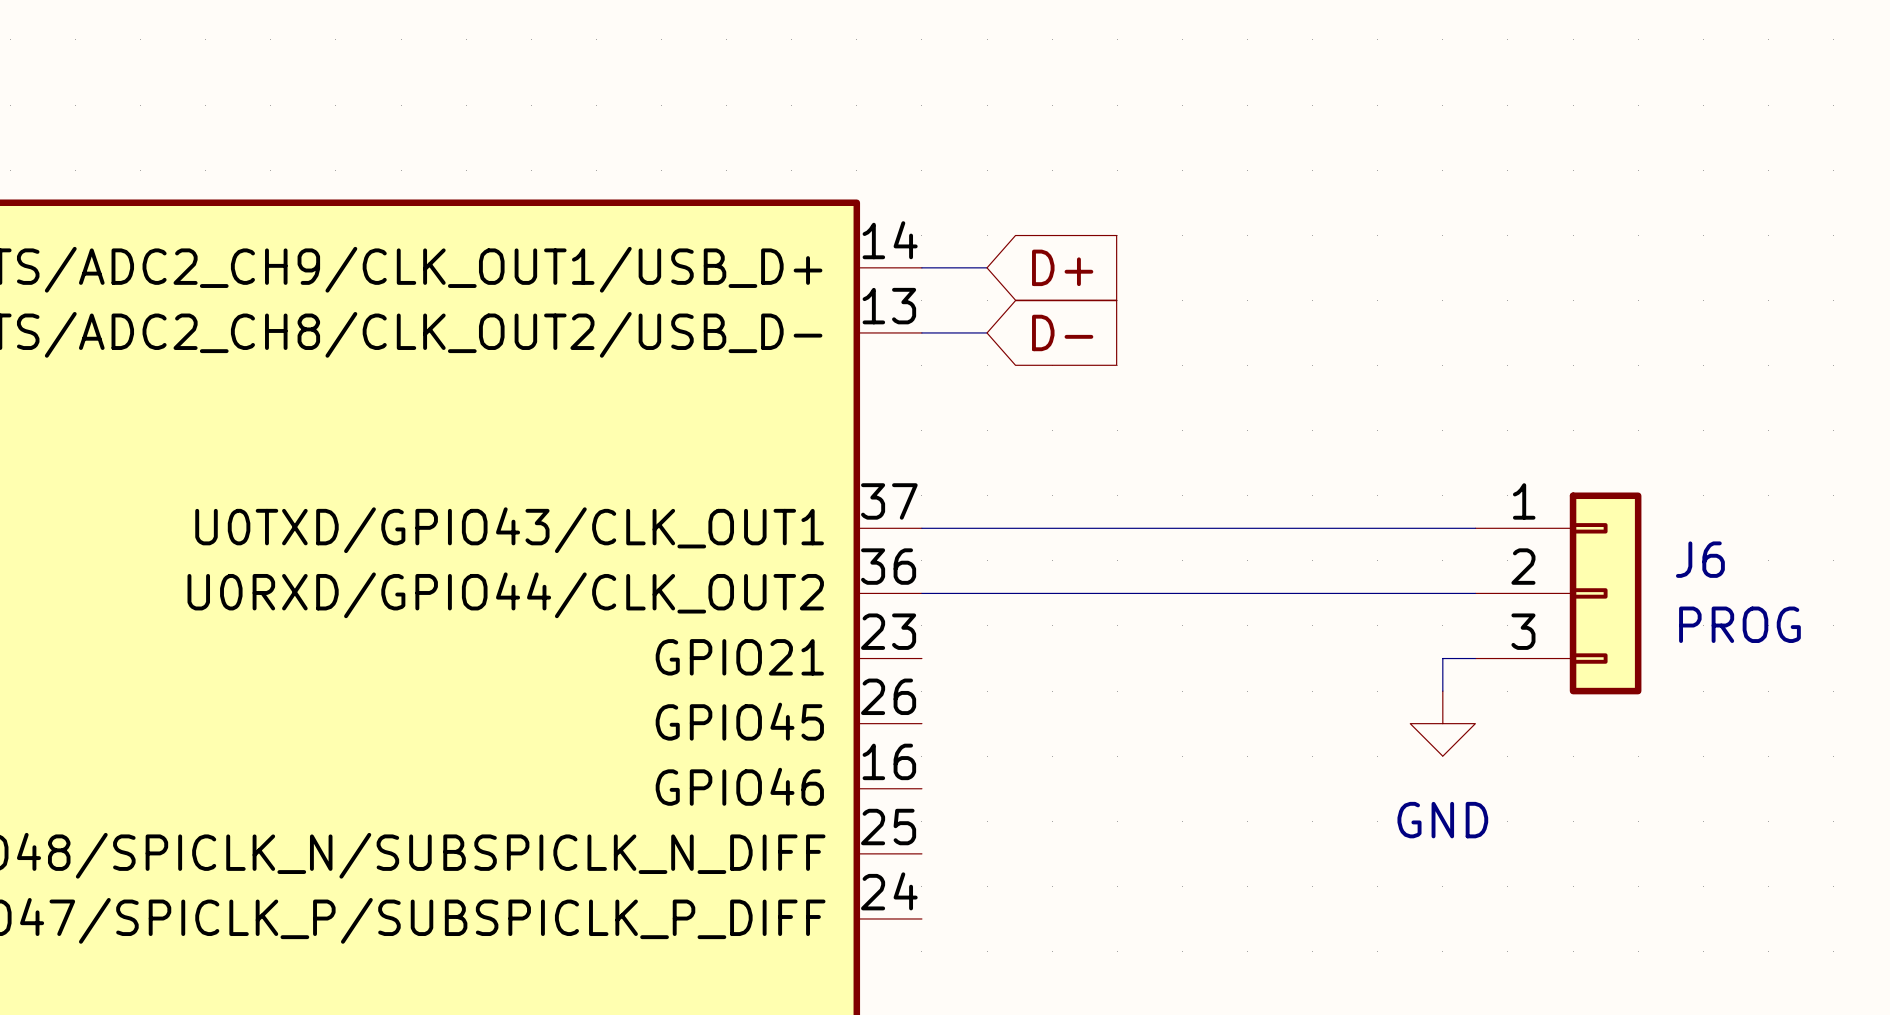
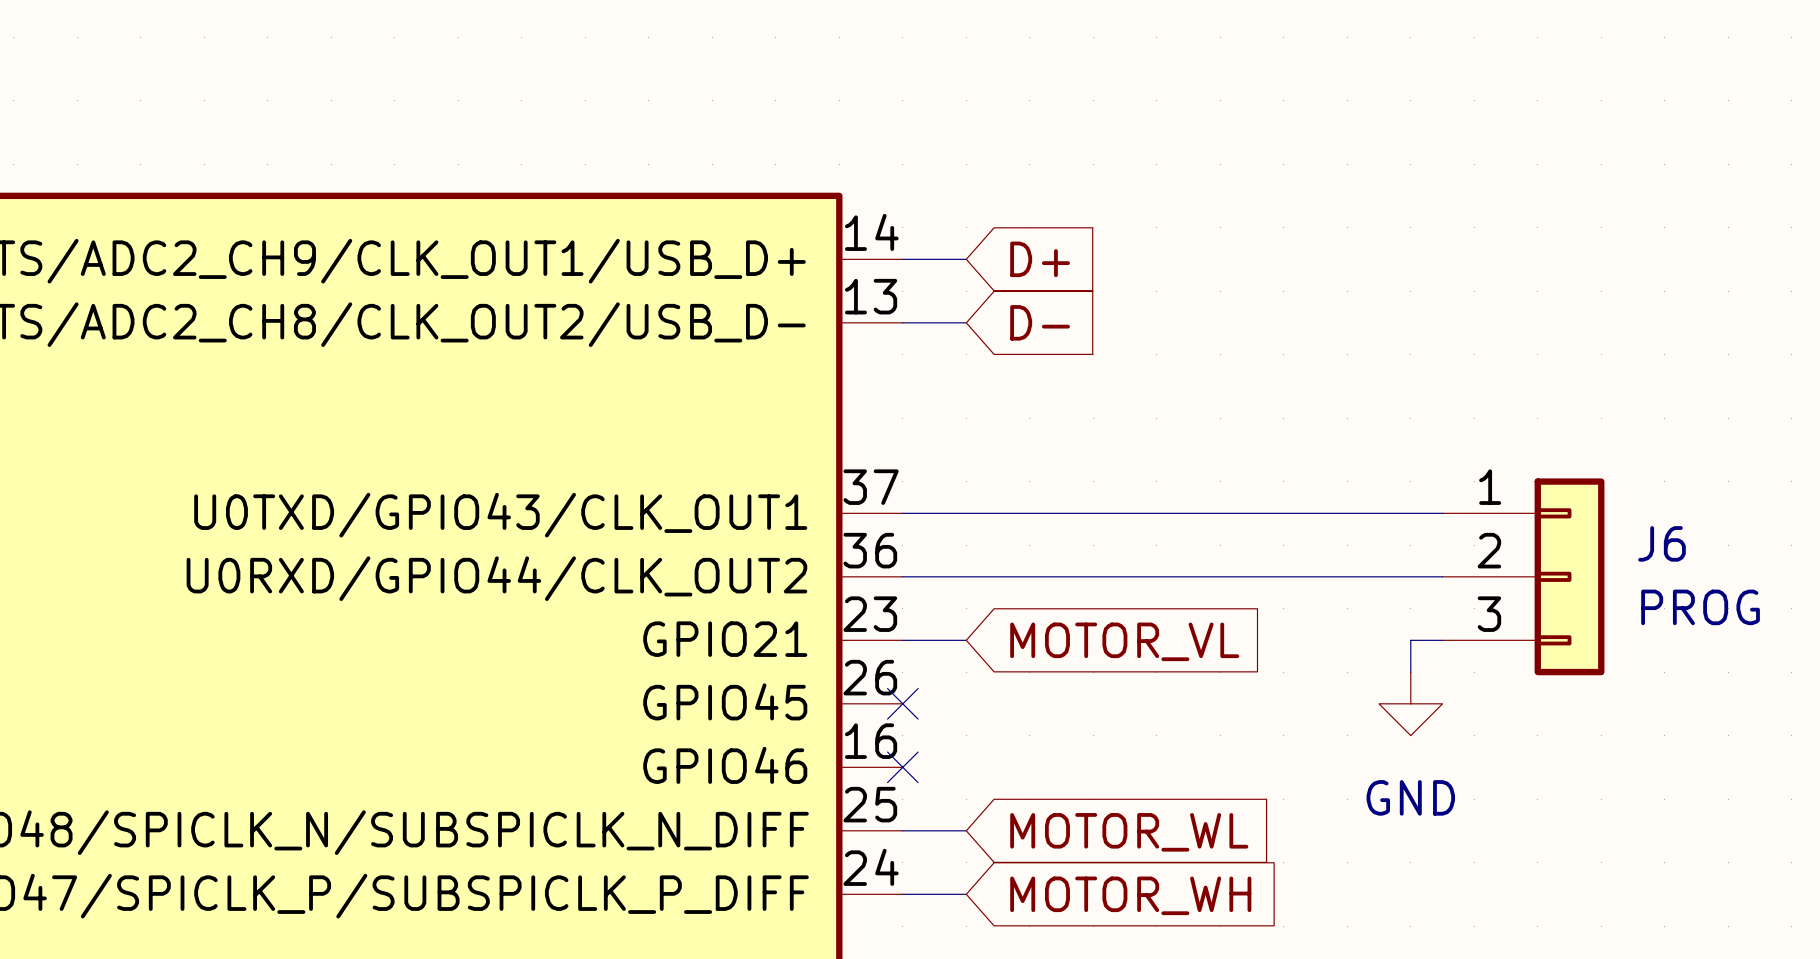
wire: none -> (902, 640) (966, 640)
global label: none -> MOTOR_VL (1124, 641)
no-connect mark: none -> (902, 703)
no-connect mark: none -> (902, 767)
wire: none -> (902, 830) (966, 830)
global label: none -> MOTOR_WL (1129, 832)
wire: none -> (902, 894) (966, 894)
global label: none -> MOTOR_WH (1130, 895)

